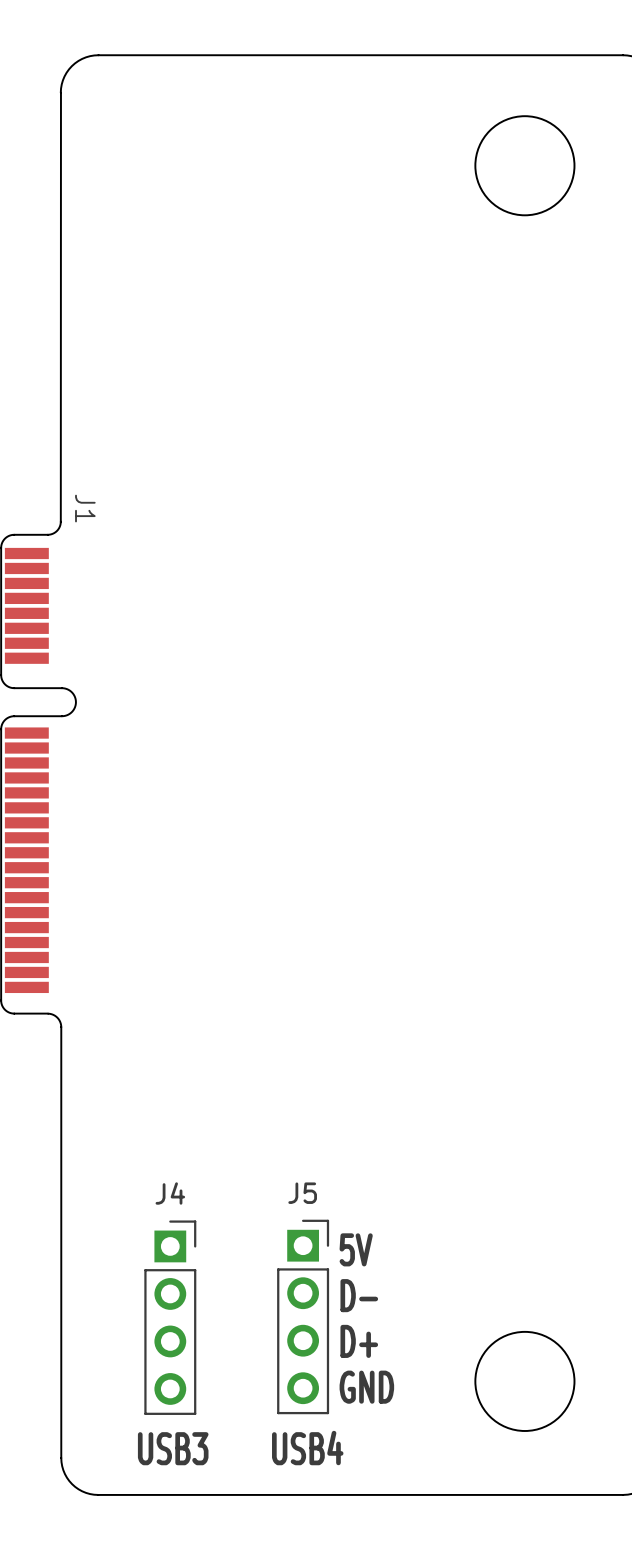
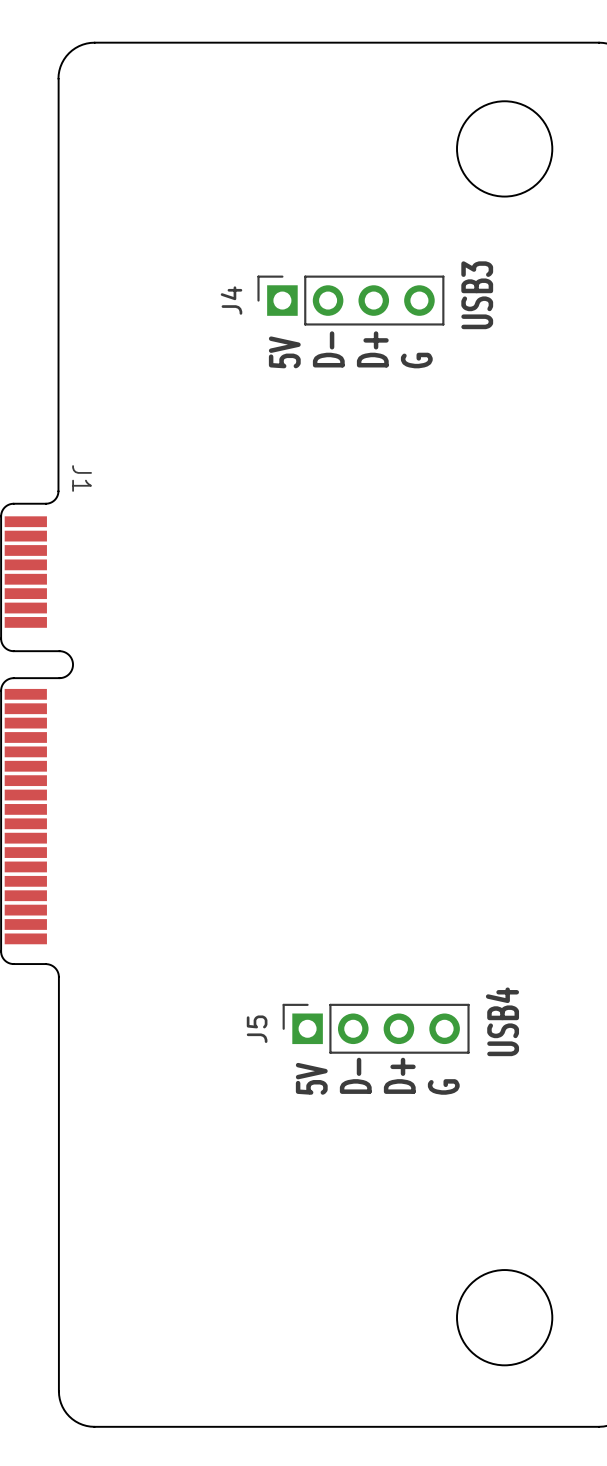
text: none -> USB3 (477, 295)
text: none -> D- (328, 349)
text: none -> D+ (372, 349)
text: none -> 5V (284, 352)
text: none -> G (416, 360)
text: none -> G (443, 1086)
text rotation: 0° (356, 1249) -> 90° counterclockwise (311, 1078)
text position: 5V (356, 1249) -> 5V (311, 1078)
text rotation: 0° (359, 1295) -> 90° counterclockwise (355, 1075)
text position: D- (359, 1295) -> D- (355, 1075)
J5 rotation: 0° (303, 1316) -> 90° counterclockwise (376, 1028)
J5 position: (303, 1316) -> (376, 1028)
J4 rotation: 0° (170, 1317) -> 90° counterclockwise (350, 300)
J4 position: (170, 1317) -> (350, 300)
text rotation: 0° (359, 1341) -> 90° counterclockwise (399, 1075)
text position: D+ (359, 1341) -> D+ (399, 1075)
text: GND (366, 1387) -> none
text: USB3 (173, 1448) -> none
text rotation: 0° (307, 1448) -> 90° counterclockwise (502, 1021)
text position: USB4 (307, 1448) -> USB4 (502, 1021)

